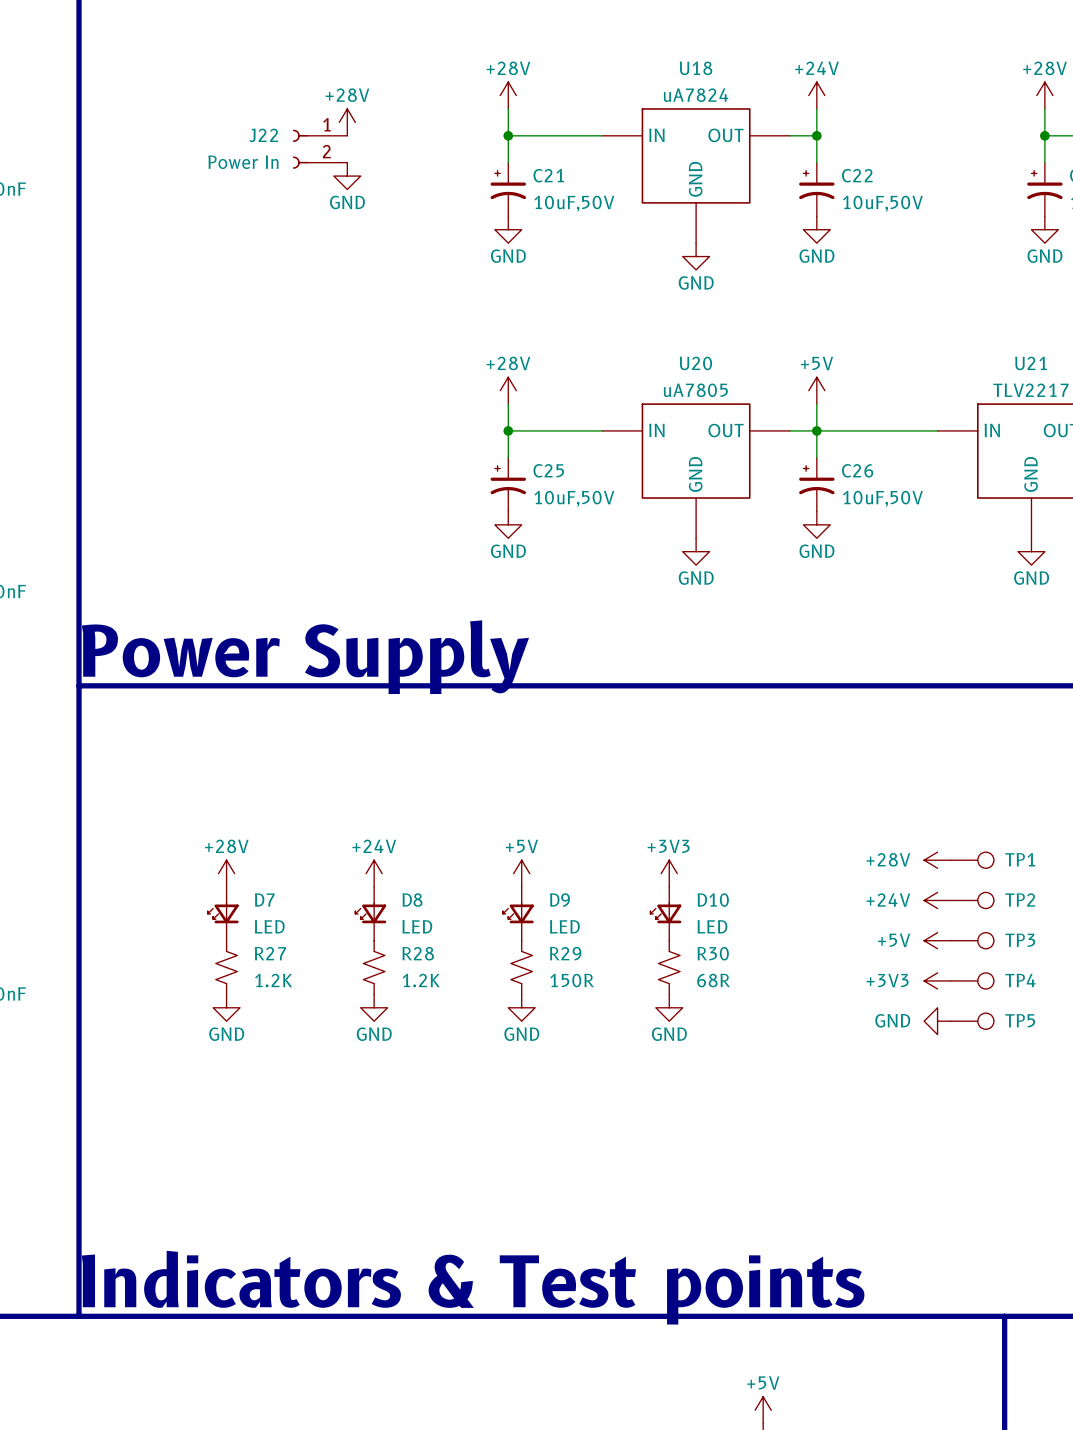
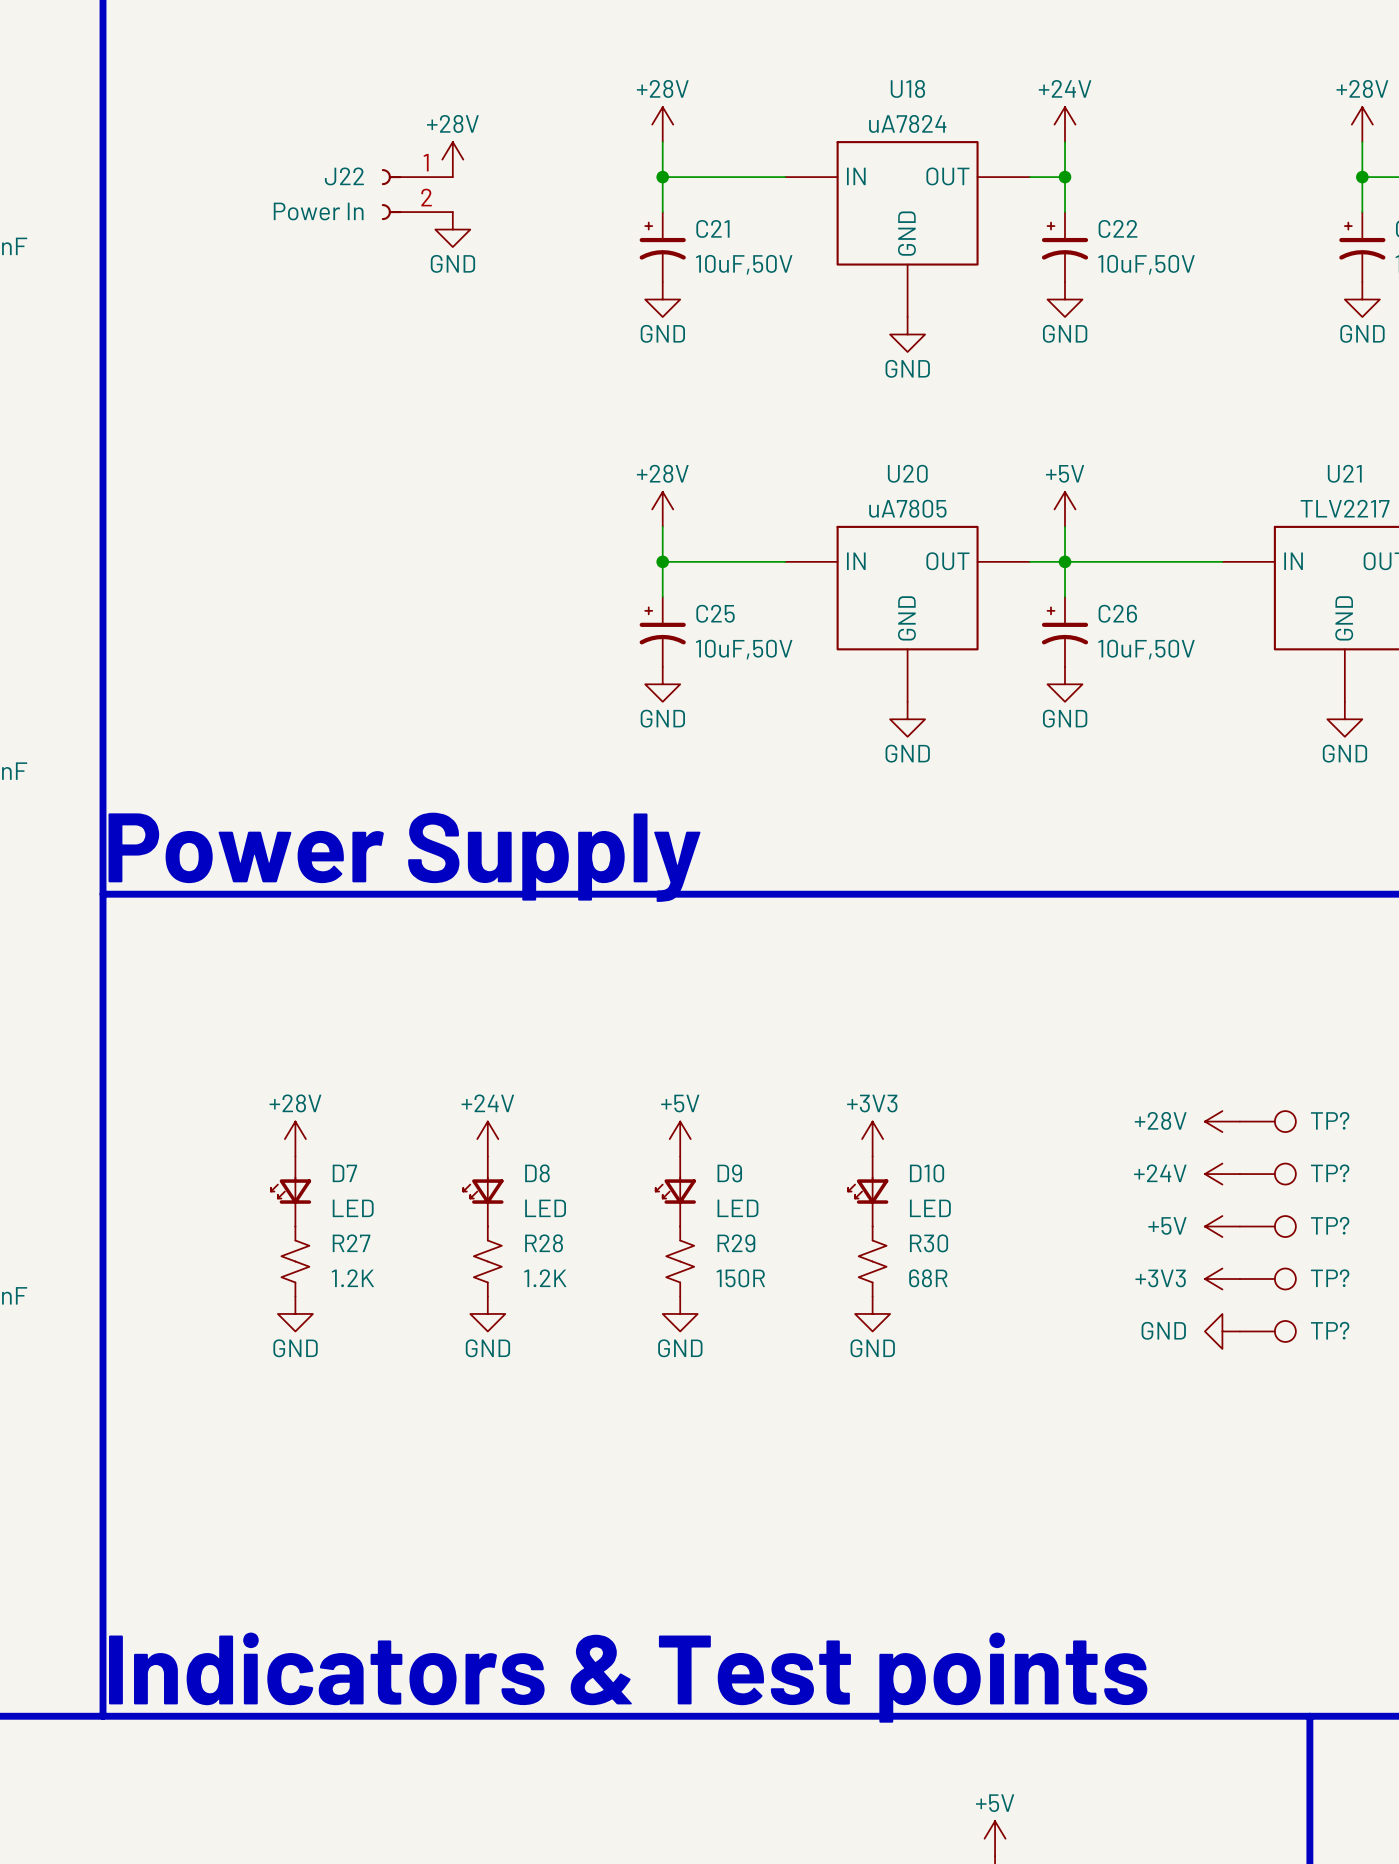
TP1 name: TP1 (1020, 859) -> TP? (1330, 1120)
TP2 name: TP2 (1020, 899) -> TP? (1330, 1173)
TP3 name: TP3 (1020, 940) -> TP? (1330, 1225)
TP4 name: TP4 (1020, 980) -> TP? (1330, 1278)
TP5 name: TP5 (1020, 1020) -> TP? (1330, 1330)

